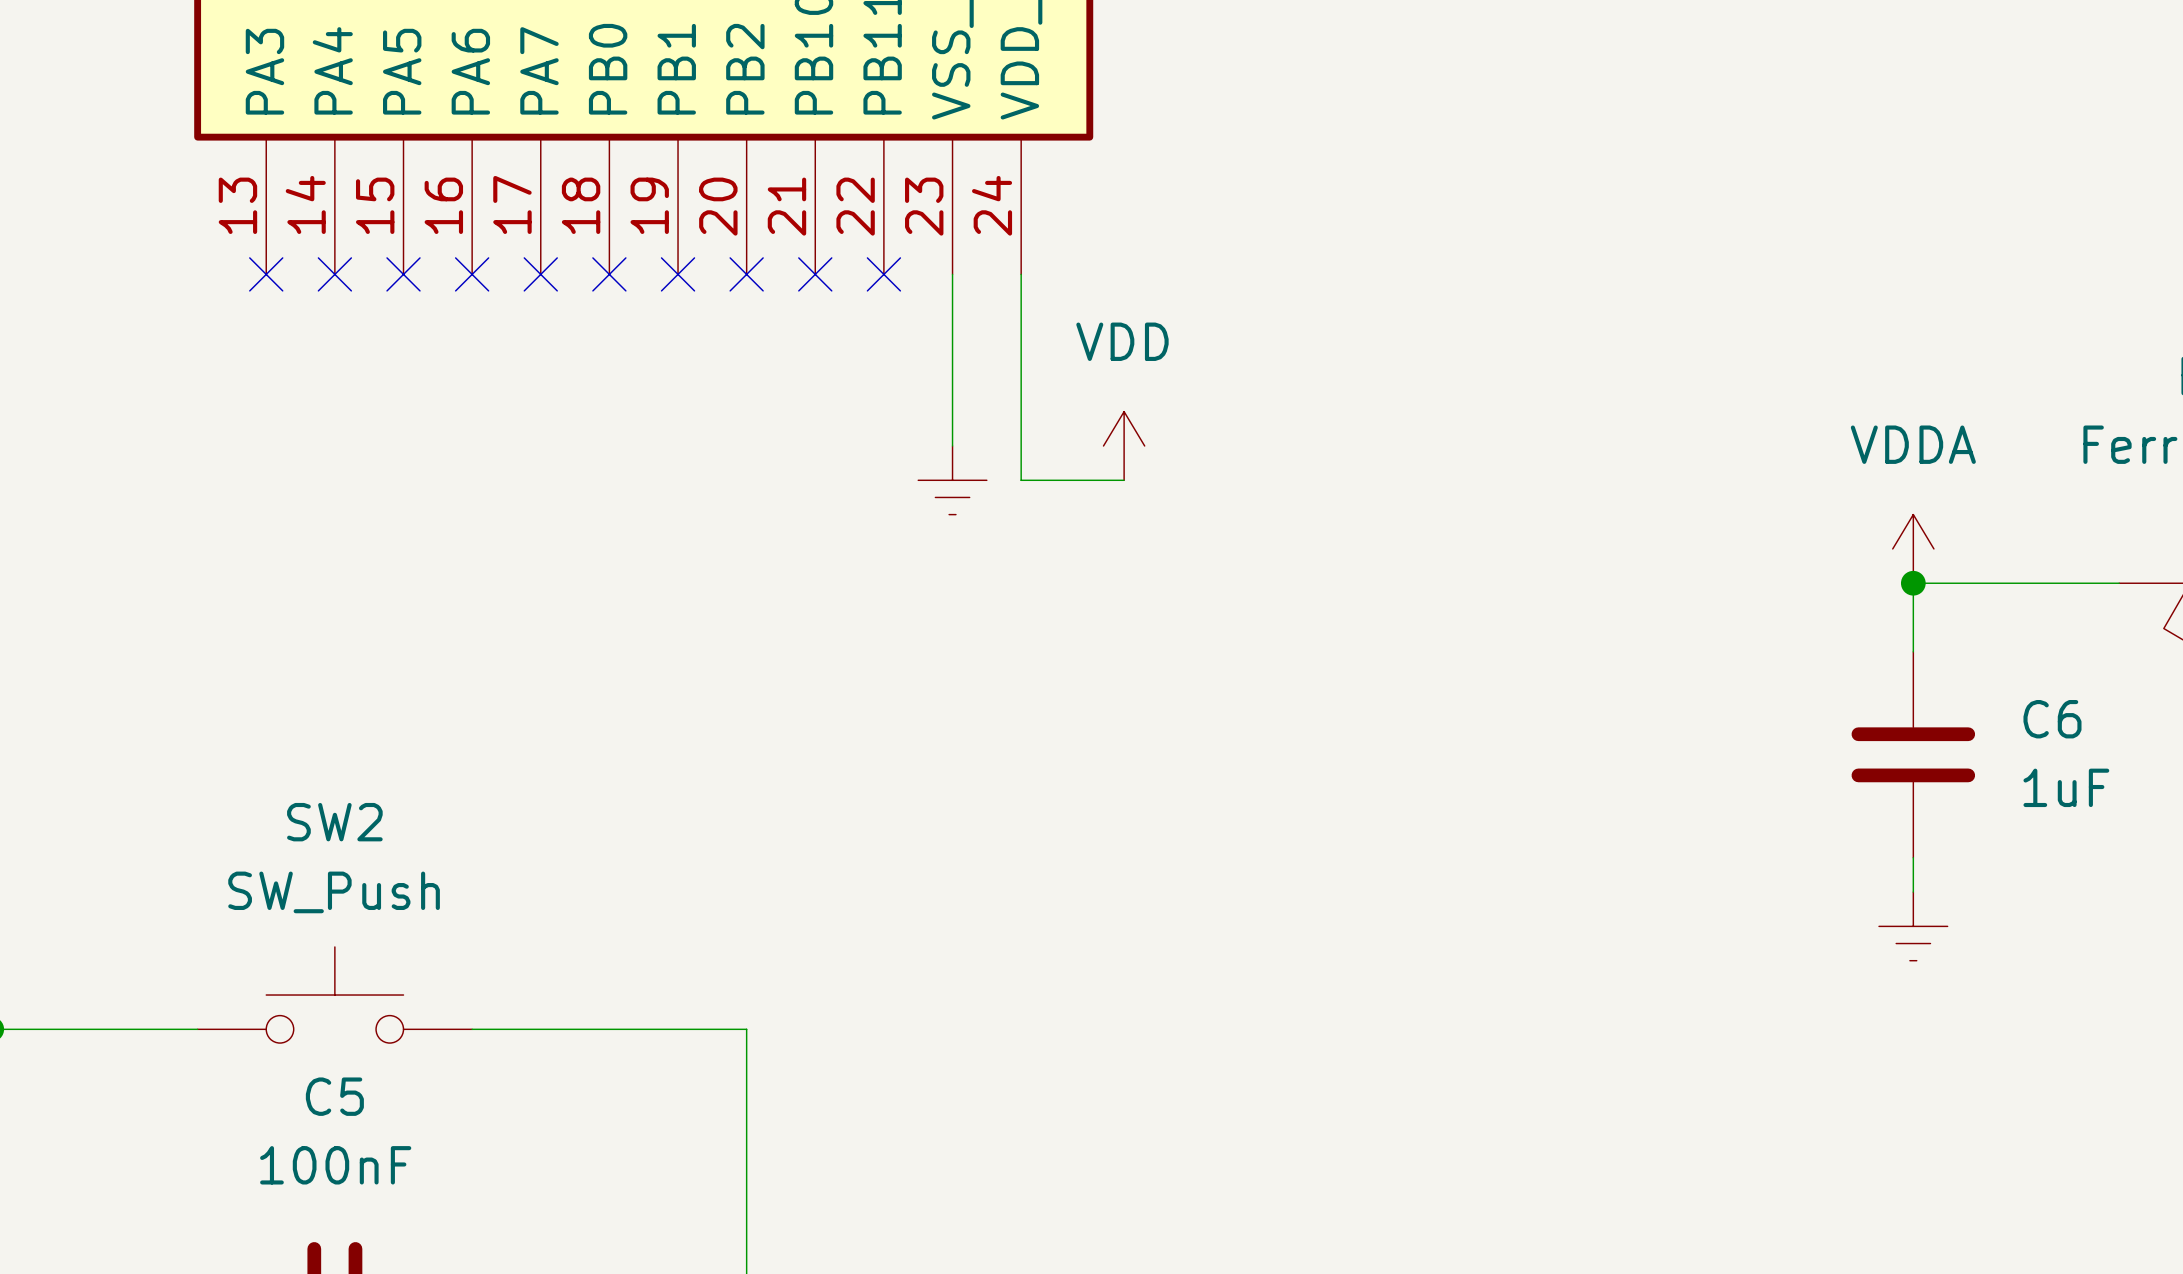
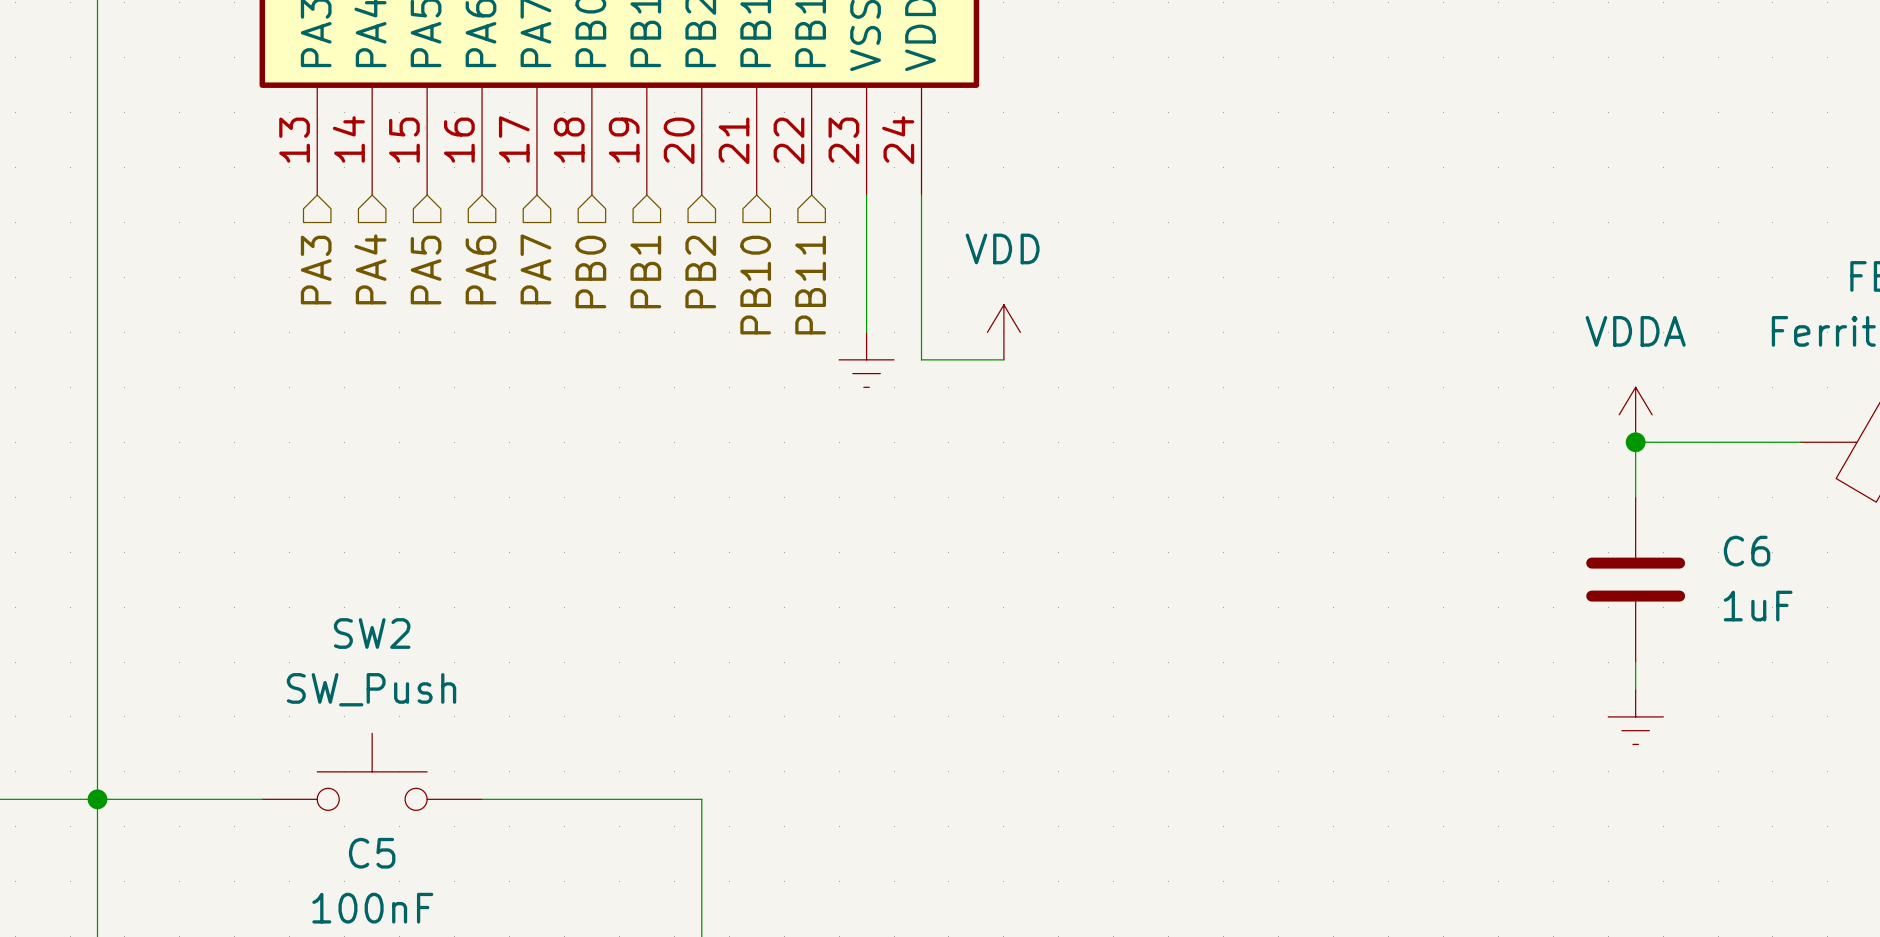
no-connect mark: (266, 274) -> none
no-connect mark: (334, 274) -> none
no-connect mark: (403, 274) -> none
no-connect mark: (472, 274) -> none
no-connect mark: (540, 274) -> none
no-connect mark: (609, 274) -> none
no-connect mark: (678, 274) -> none
no-connect mark: (746, 274) -> none
no-connect mark: (815, 274) -> none
no-connect mark: (883, 274) -> none
hierarchical label: none -> PA4 (370, 269)
hierarchical label: none -> PA7 (535, 269)
hierarchical label: none -> PA3 (316, 270)
hierarchical label: none -> PA5 (426, 270)
hierarchical label: none -> PA6 (481, 270)
hierarchical label: none -> PB0 (590, 272)
hierarchical label: none -> PB1 (645, 272)
hierarchical label: none -> PB2 (700, 272)
hierarchical label: none -> PB10 (755, 285)
hierarchical label: none -> PB11 (810, 285)

